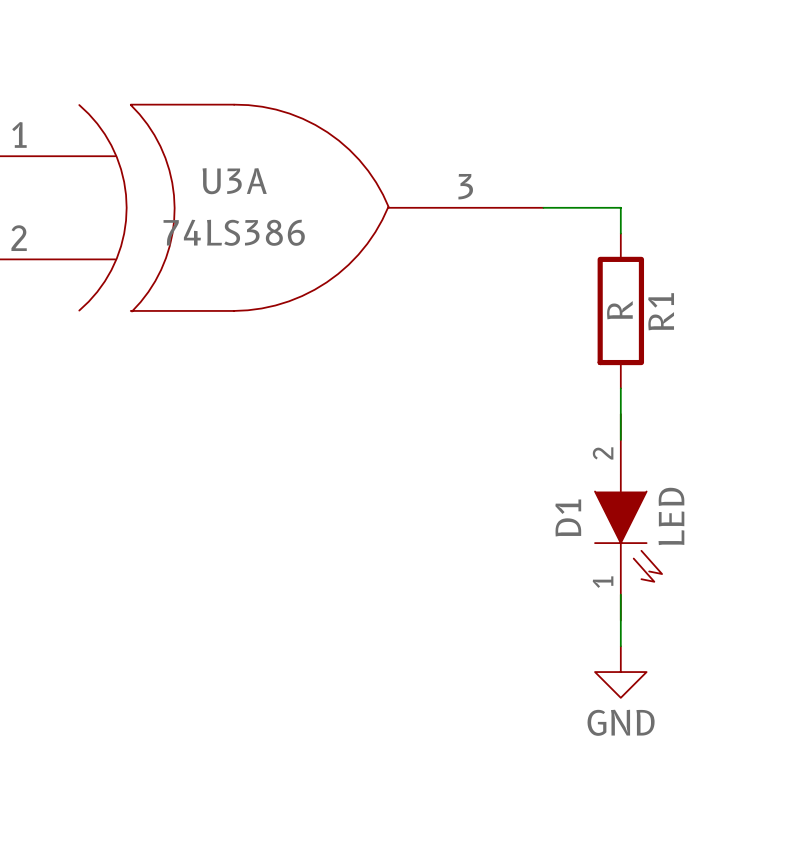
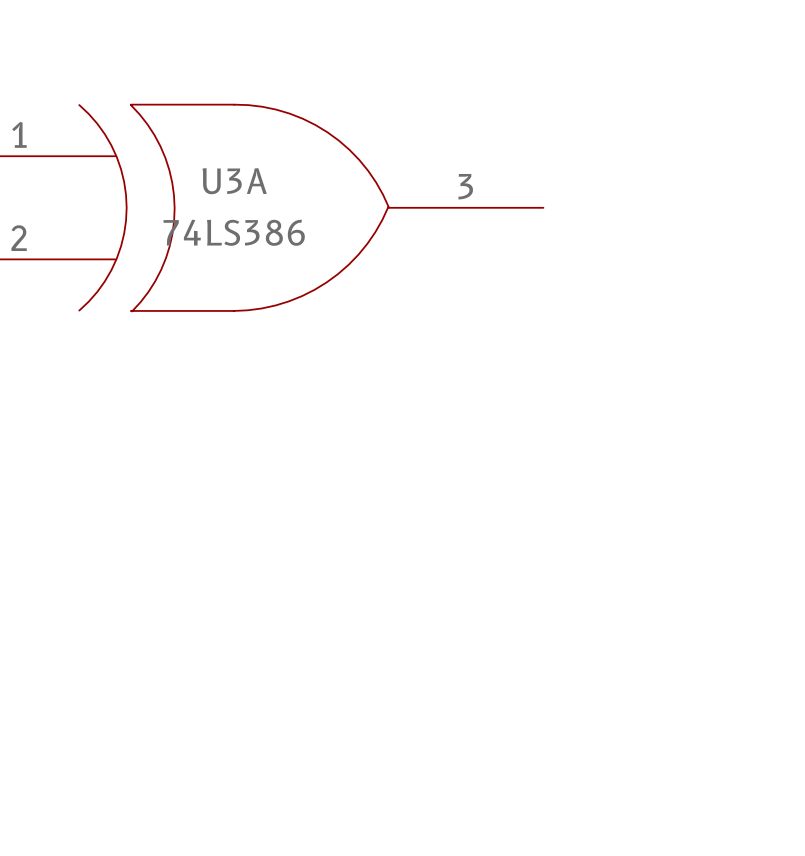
wire: (543, 207) (620, 207) (620, 233) -> none
R1: R (620, 310) -> none
wire: (620, 388) (620, 439) -> none
D1: LED (628, 517) -> none
wire: (620, 594) (620, 646) -> none
power symbol: GND (620, 672) -> none

